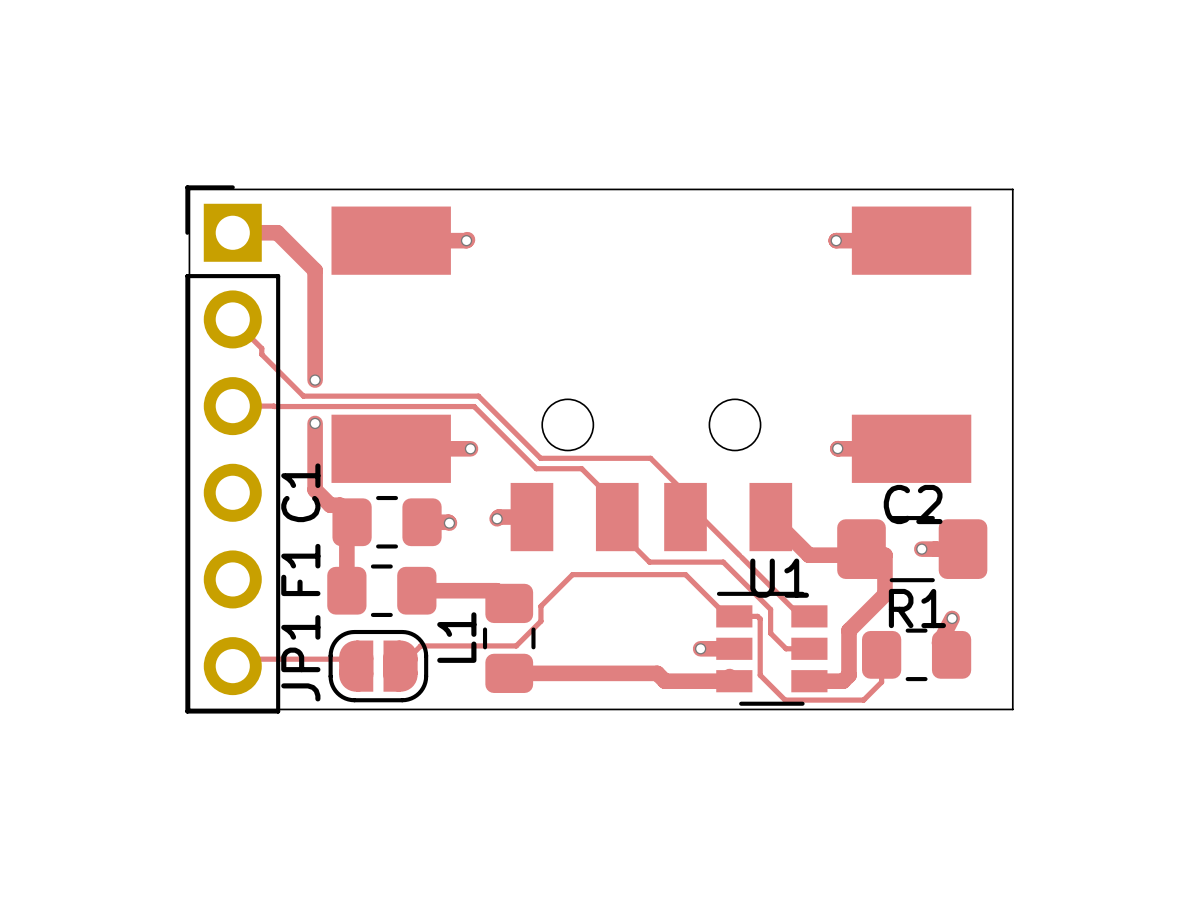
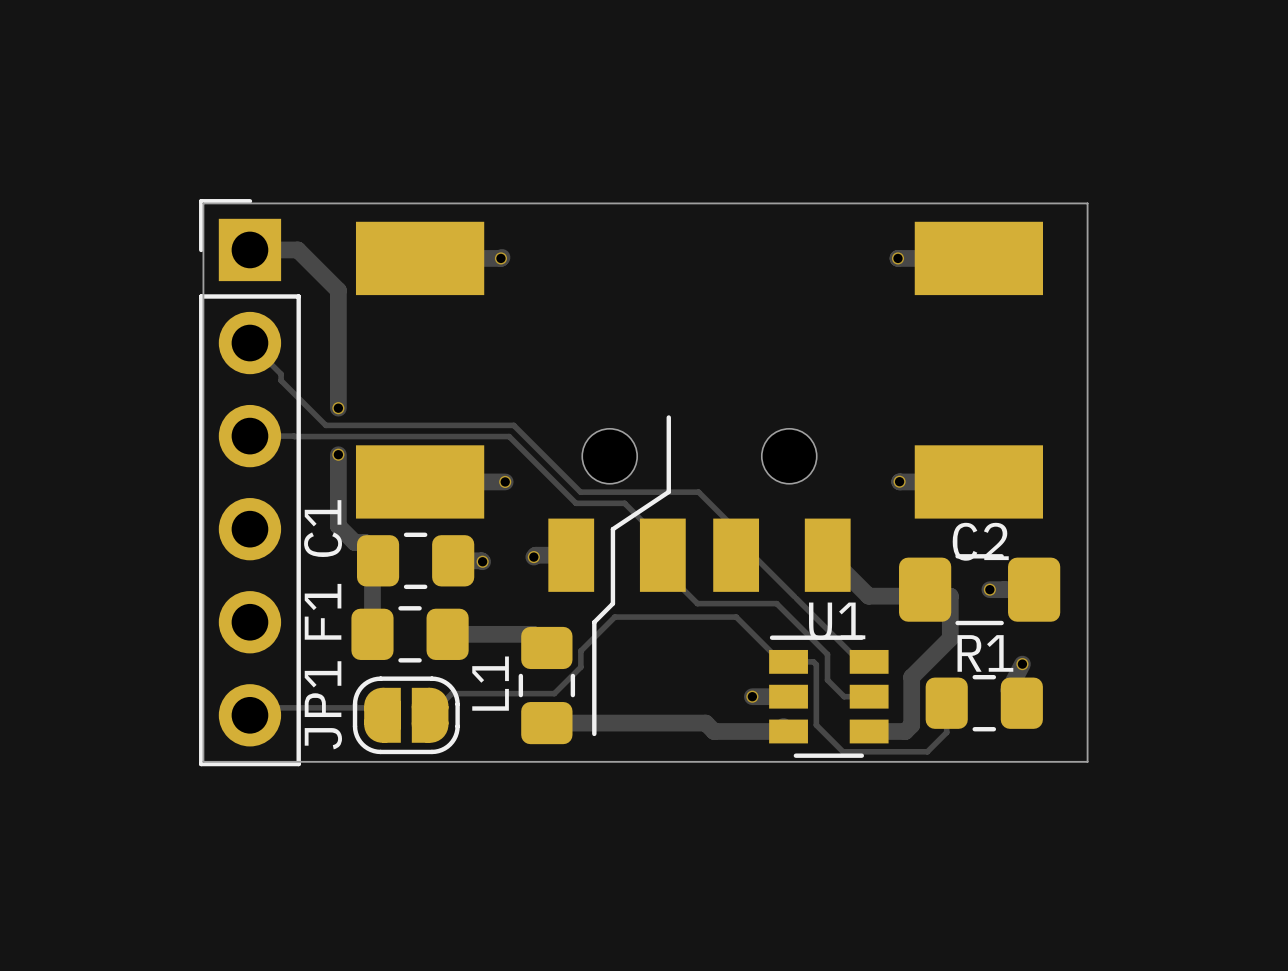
line: none -> (668, 417) (668, 491) (612, 529) (612, 603) (594, 622) (594, 733)

